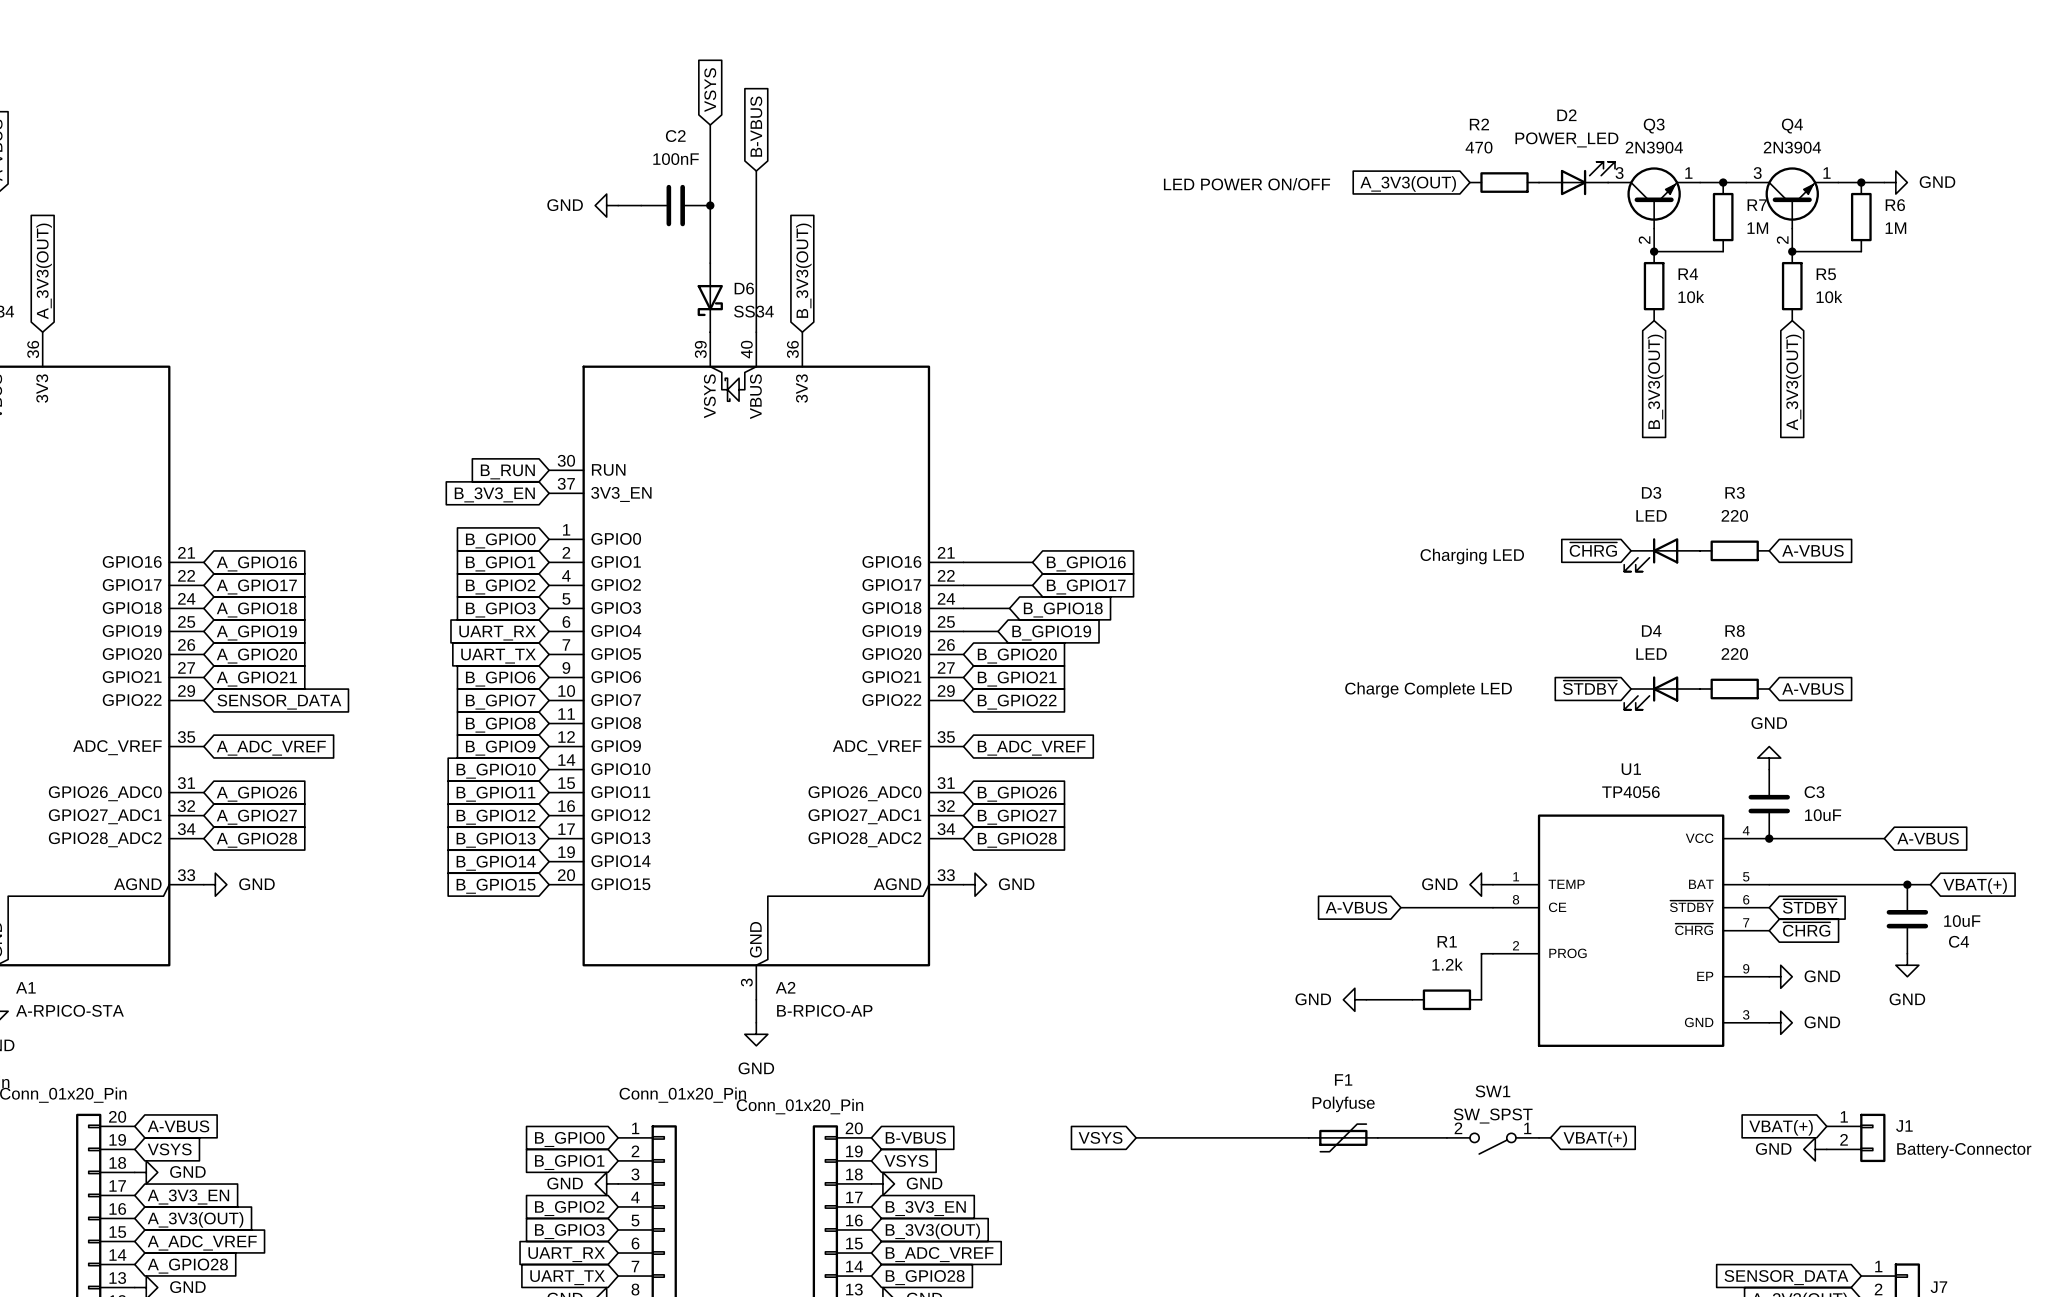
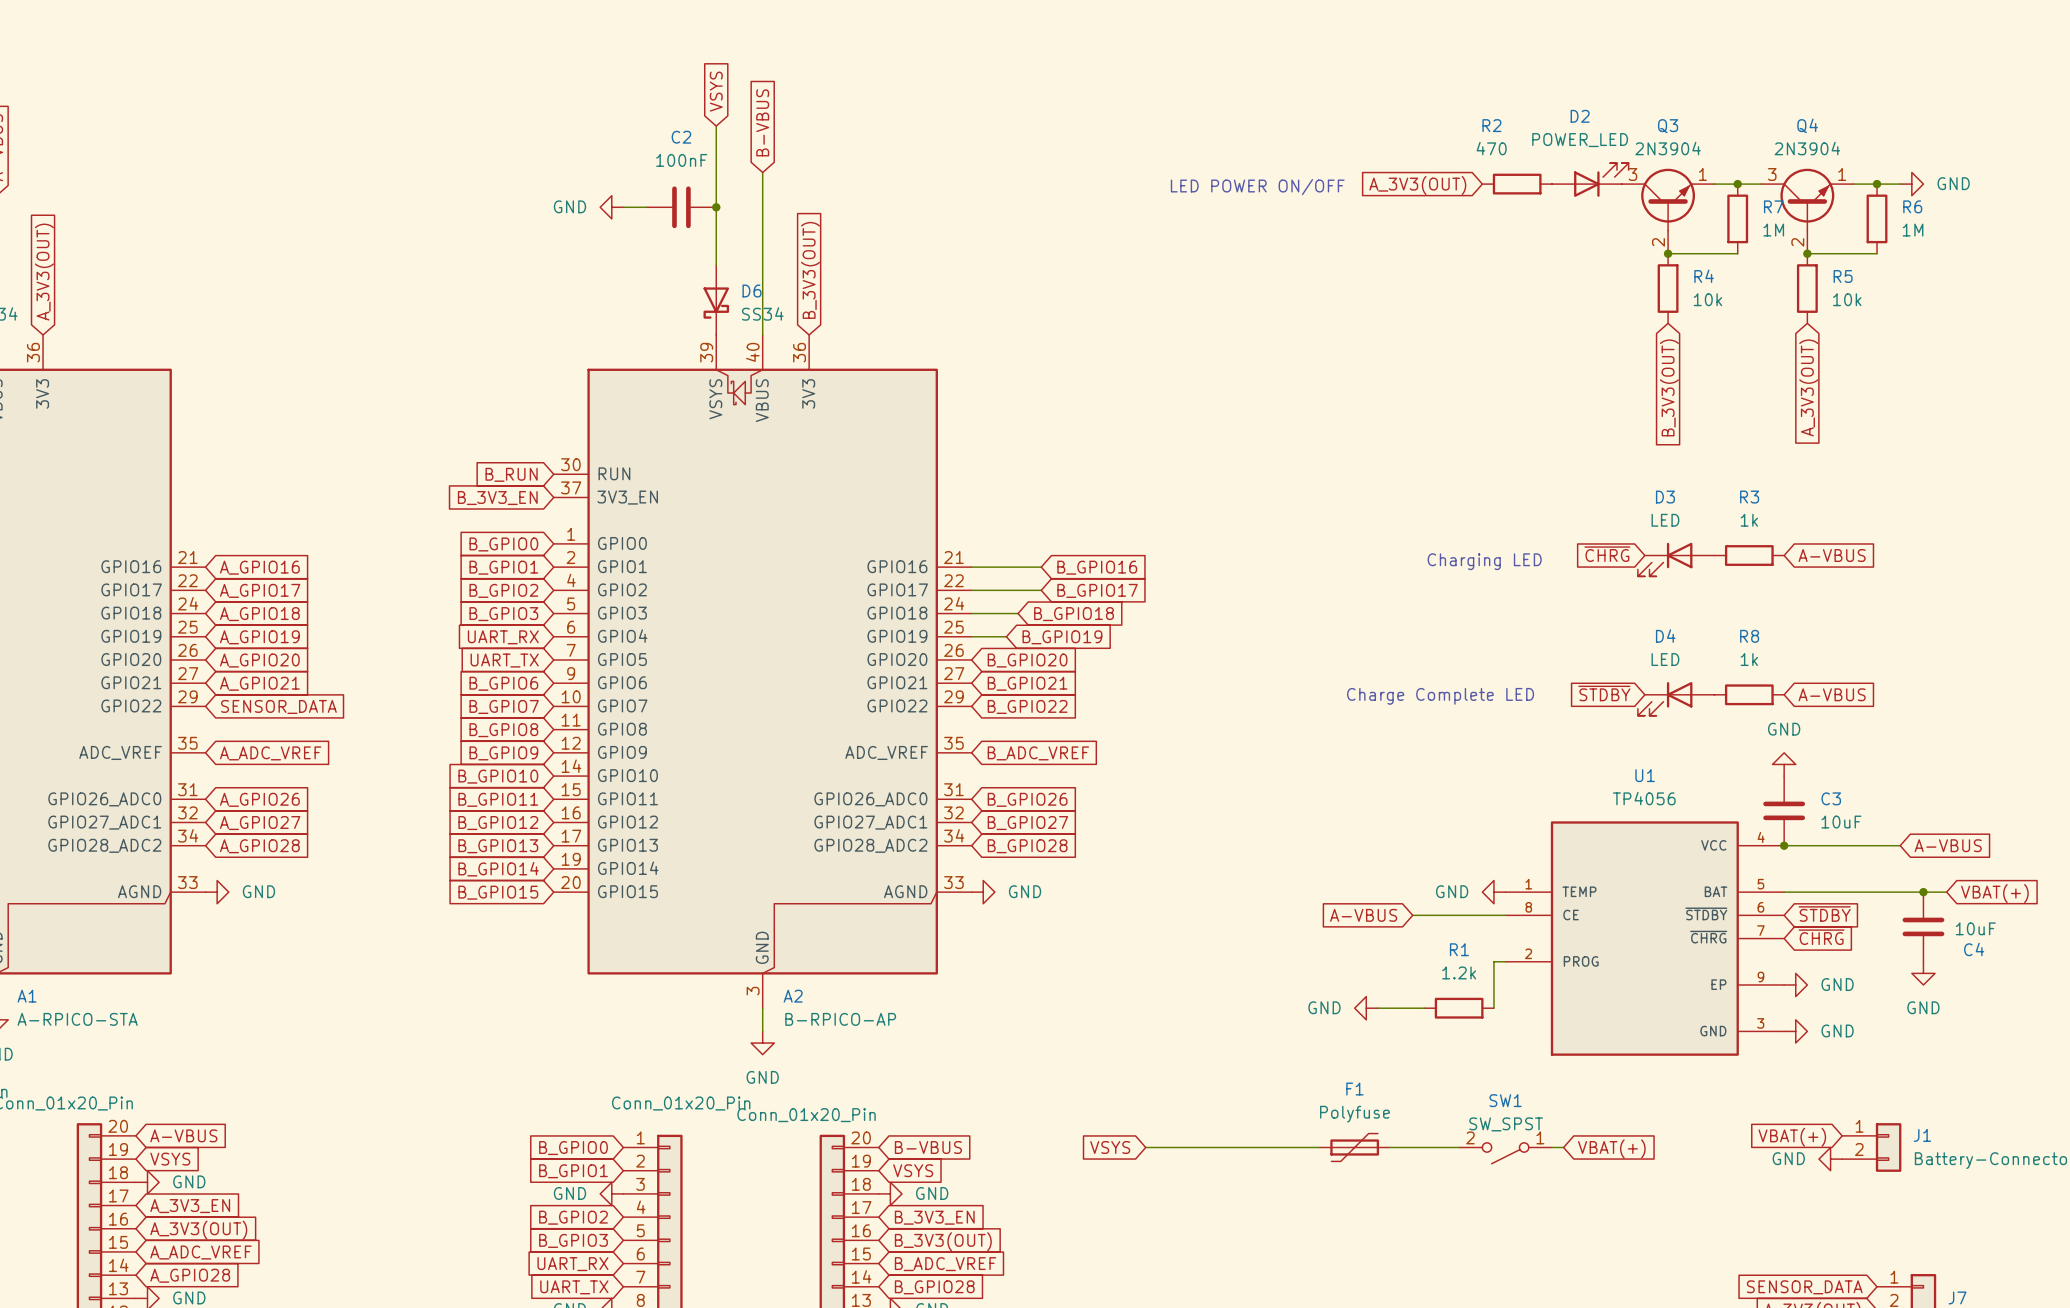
R3 value: 220 (1734, 515) -> 1k (1749, 520)
R8 value: 220 (1734, 654) -> 1k (1749, 659)

